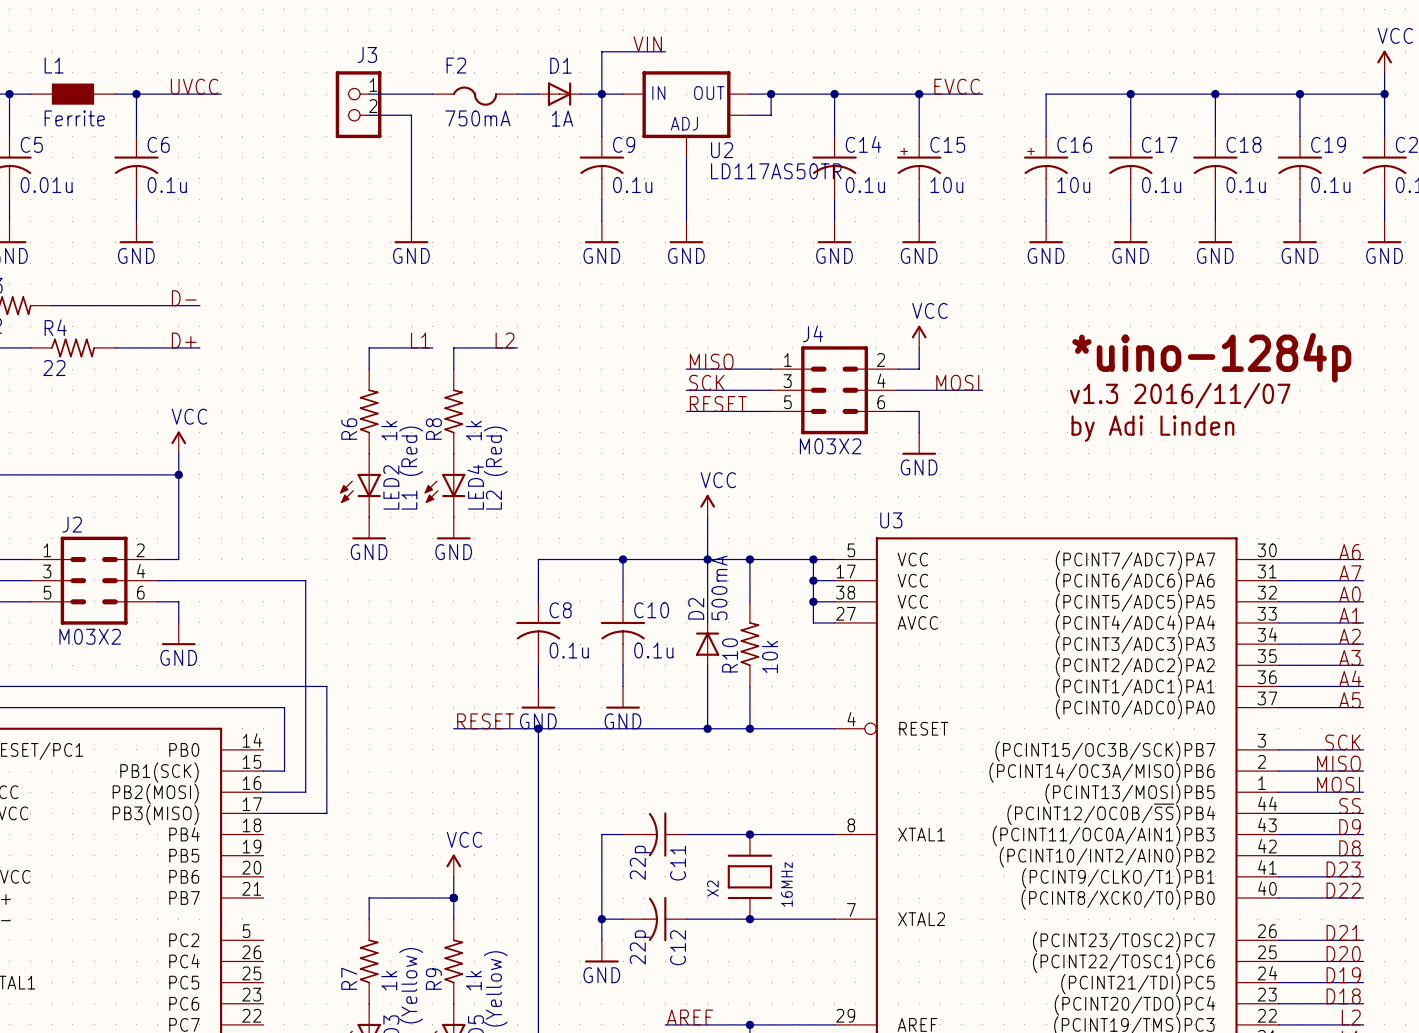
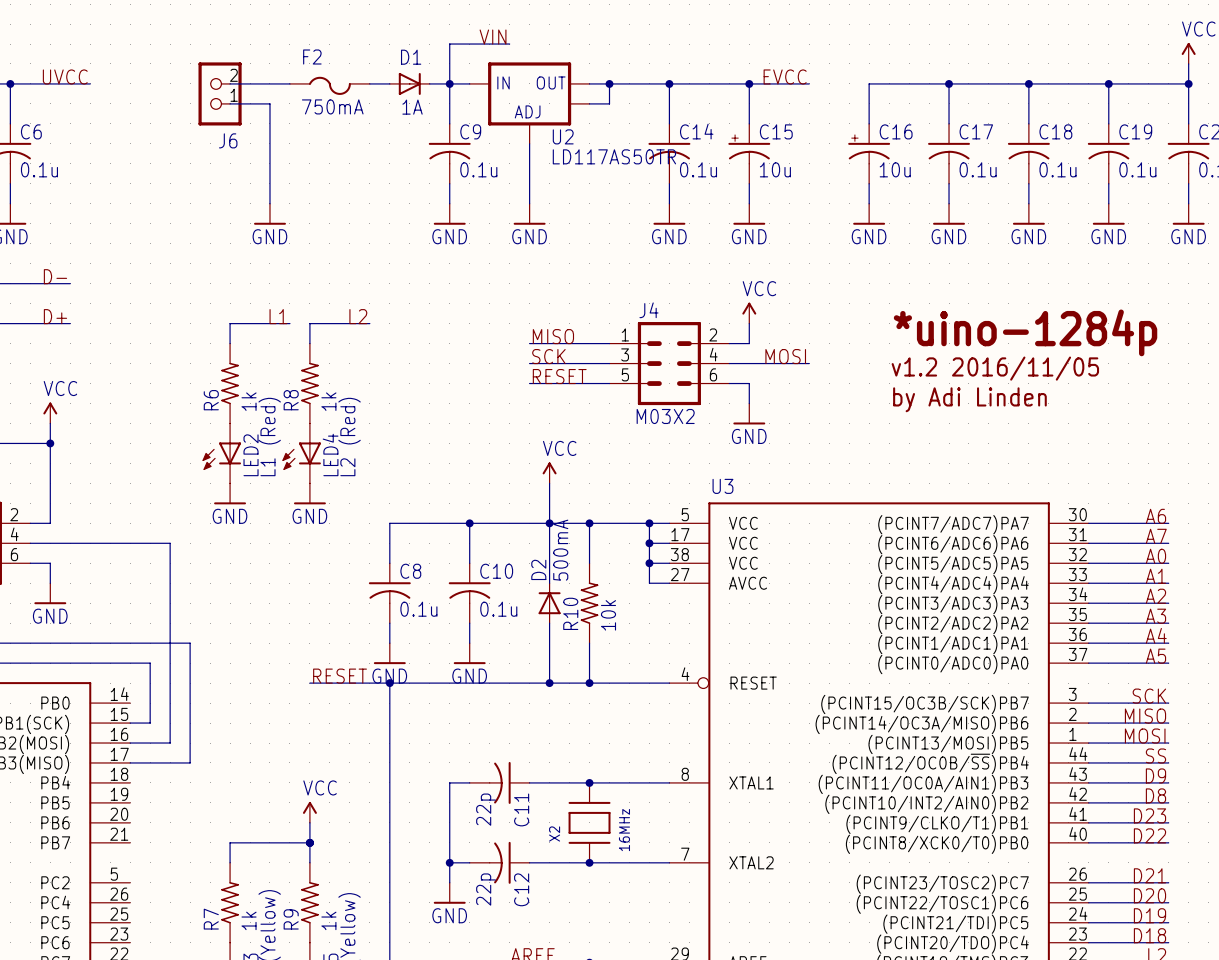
J3 name: J3 (367, 54) -> J6 (228, 140)
J3 flip: as is (358, 104) -> up-down (220, 93)
text: v1.3 2016/11/07 (1180, 395) -> v1.2 2016/11/05 (995, 368)

